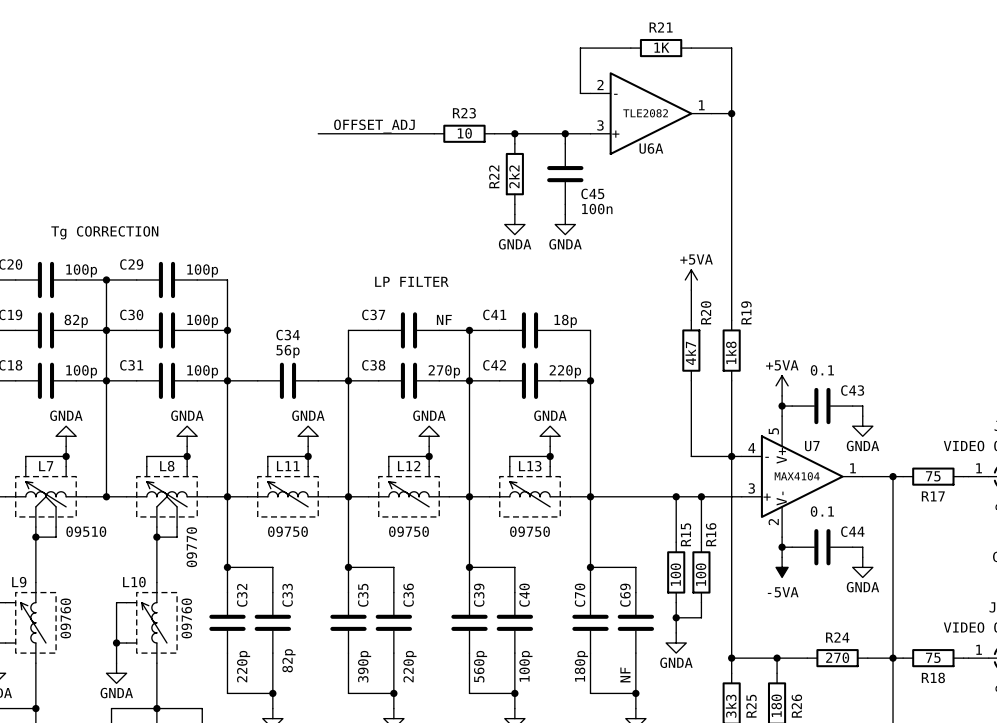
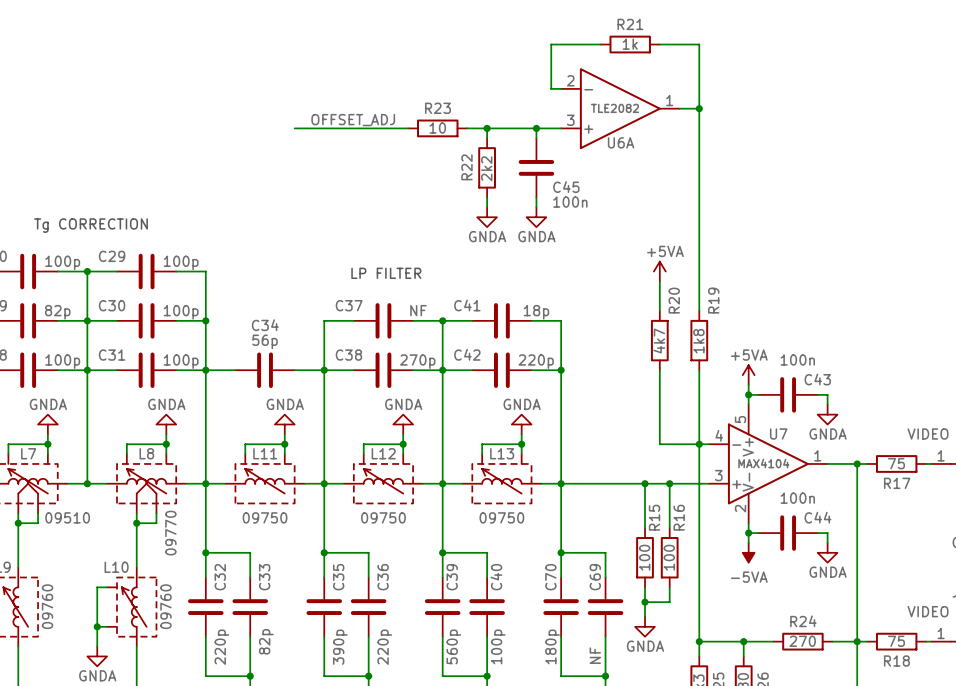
R21 value: 1K (661, 47) -> 1k (630, 44)
C43 value: 0.1 (822, 370) -> 100n (797, 359)
C44 value: 0.1 (822, 511) -> 100n (797, 498)

